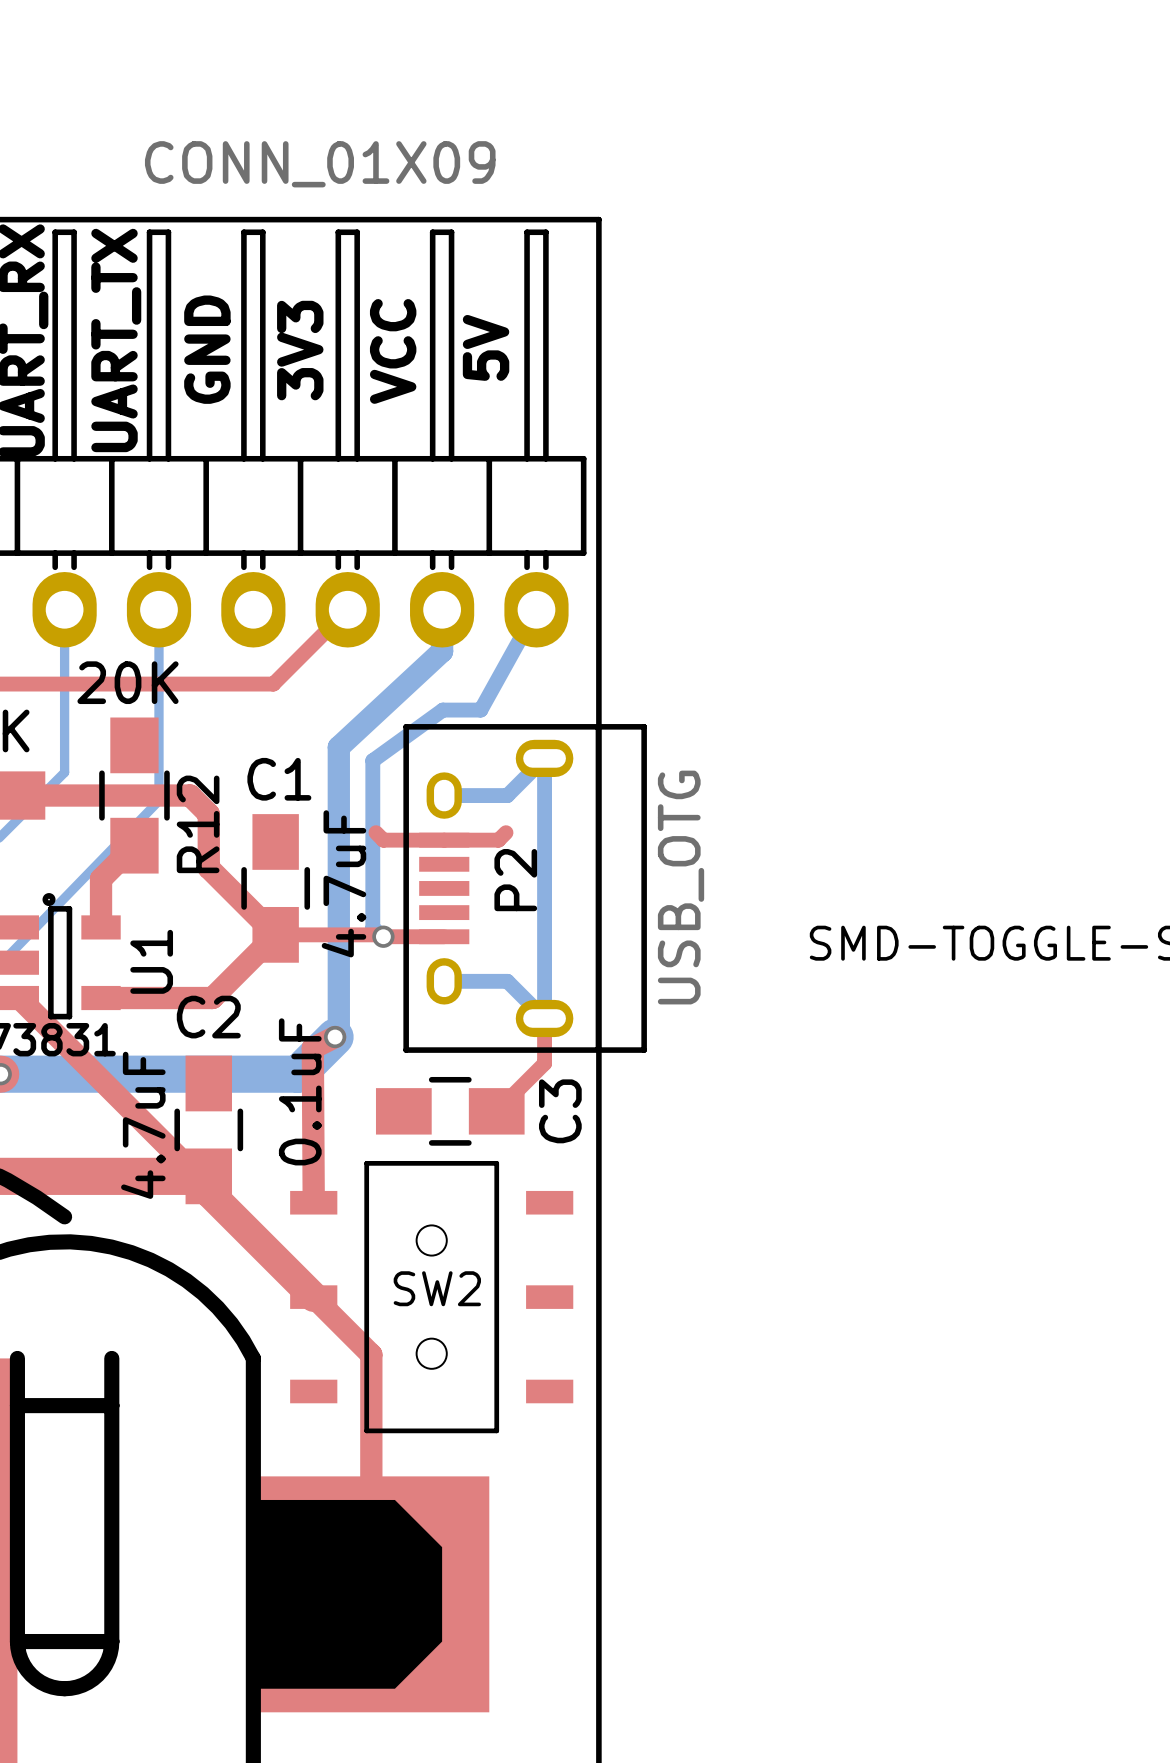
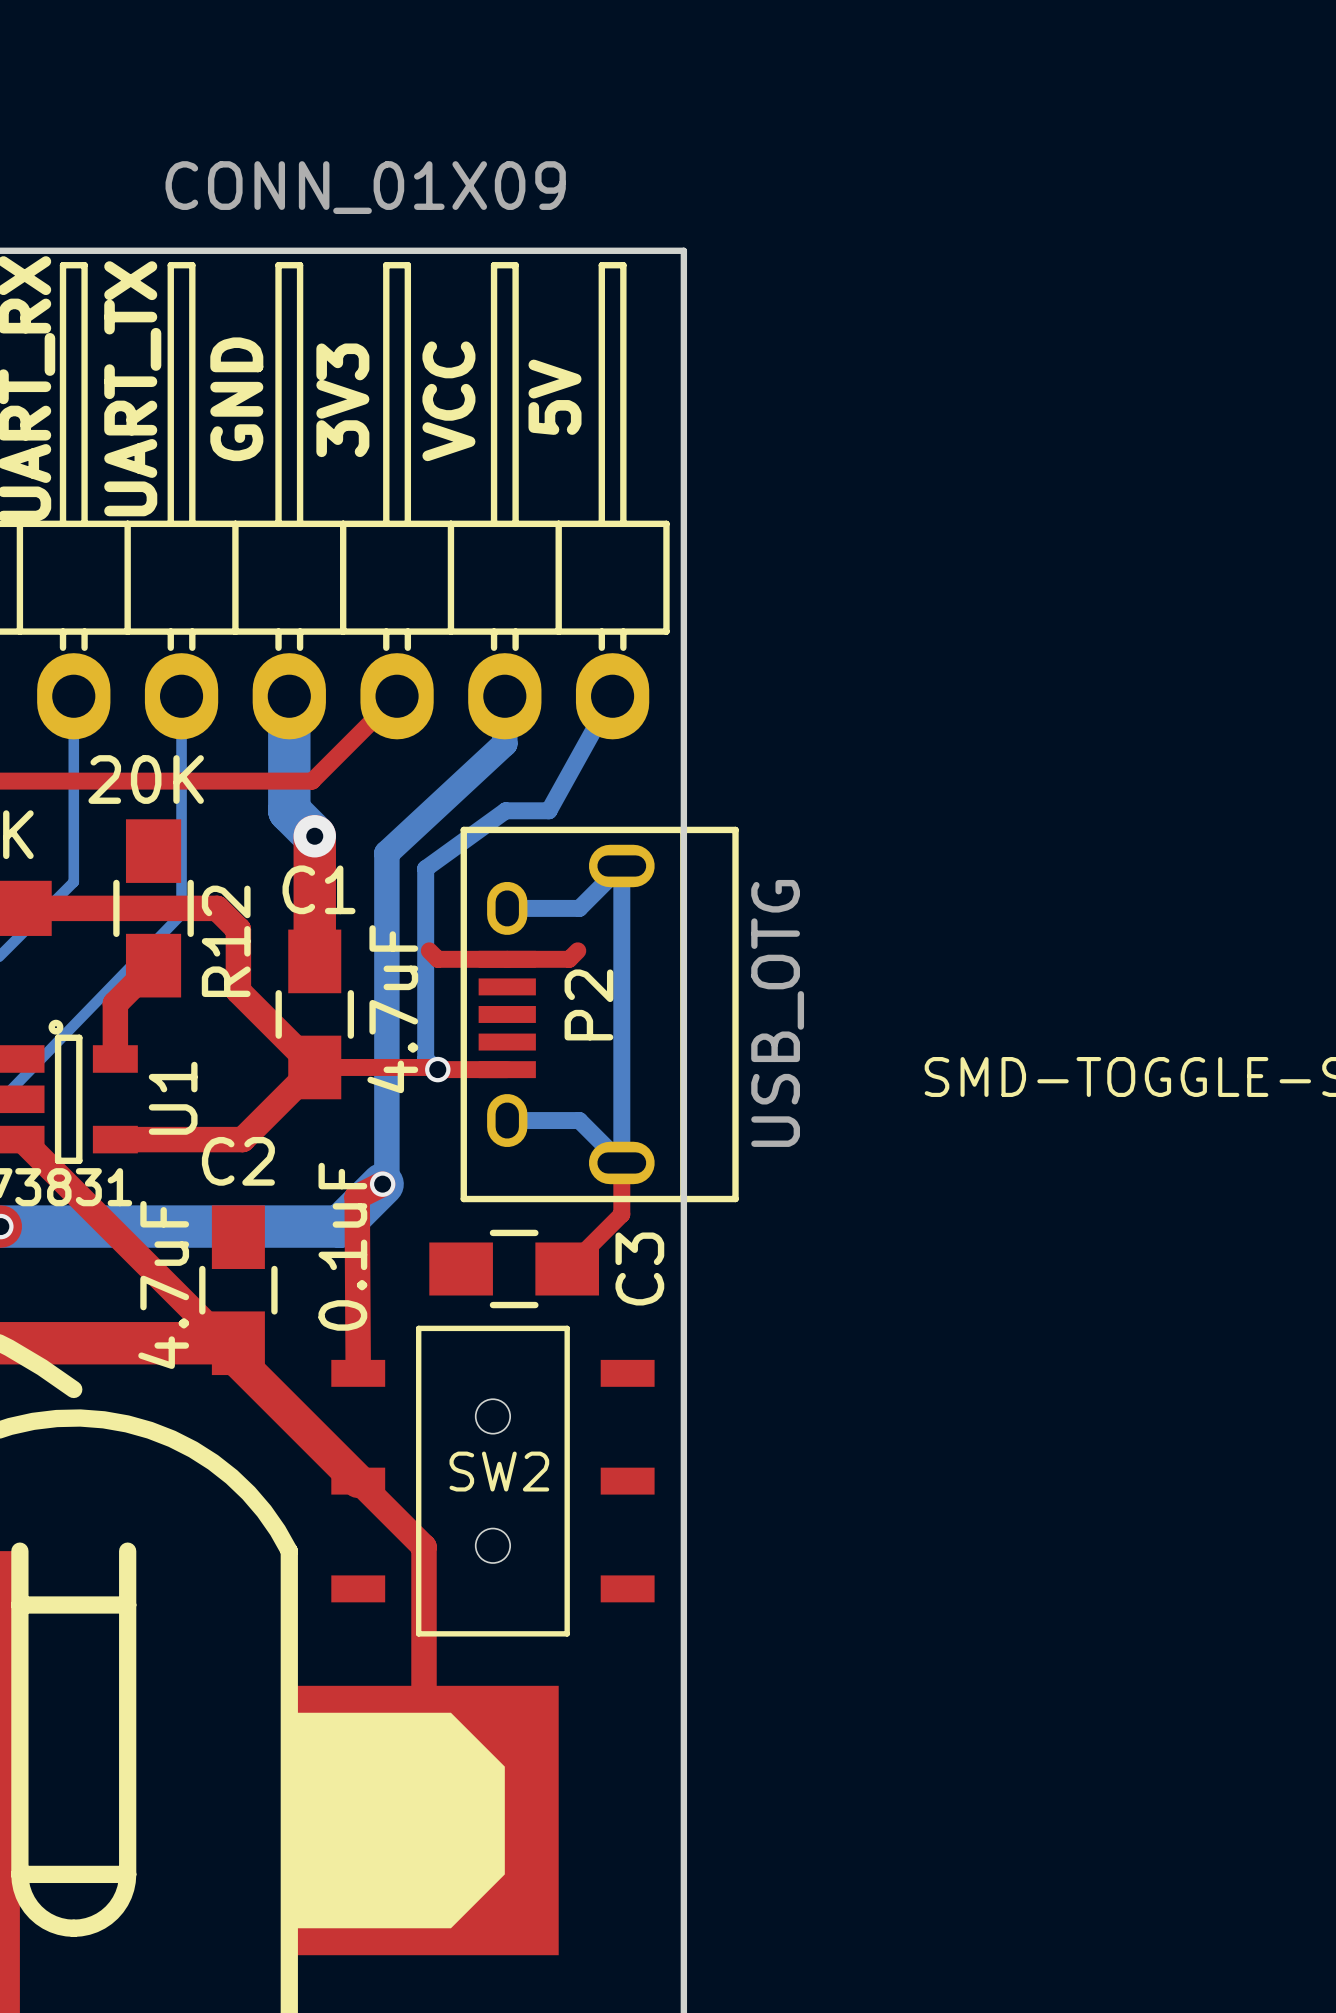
bottom track: none -> (289, 696) (289, 810) (314, 836)
top track: none -> (314, 836) (314, 961)
via: none -> (314, 836)

